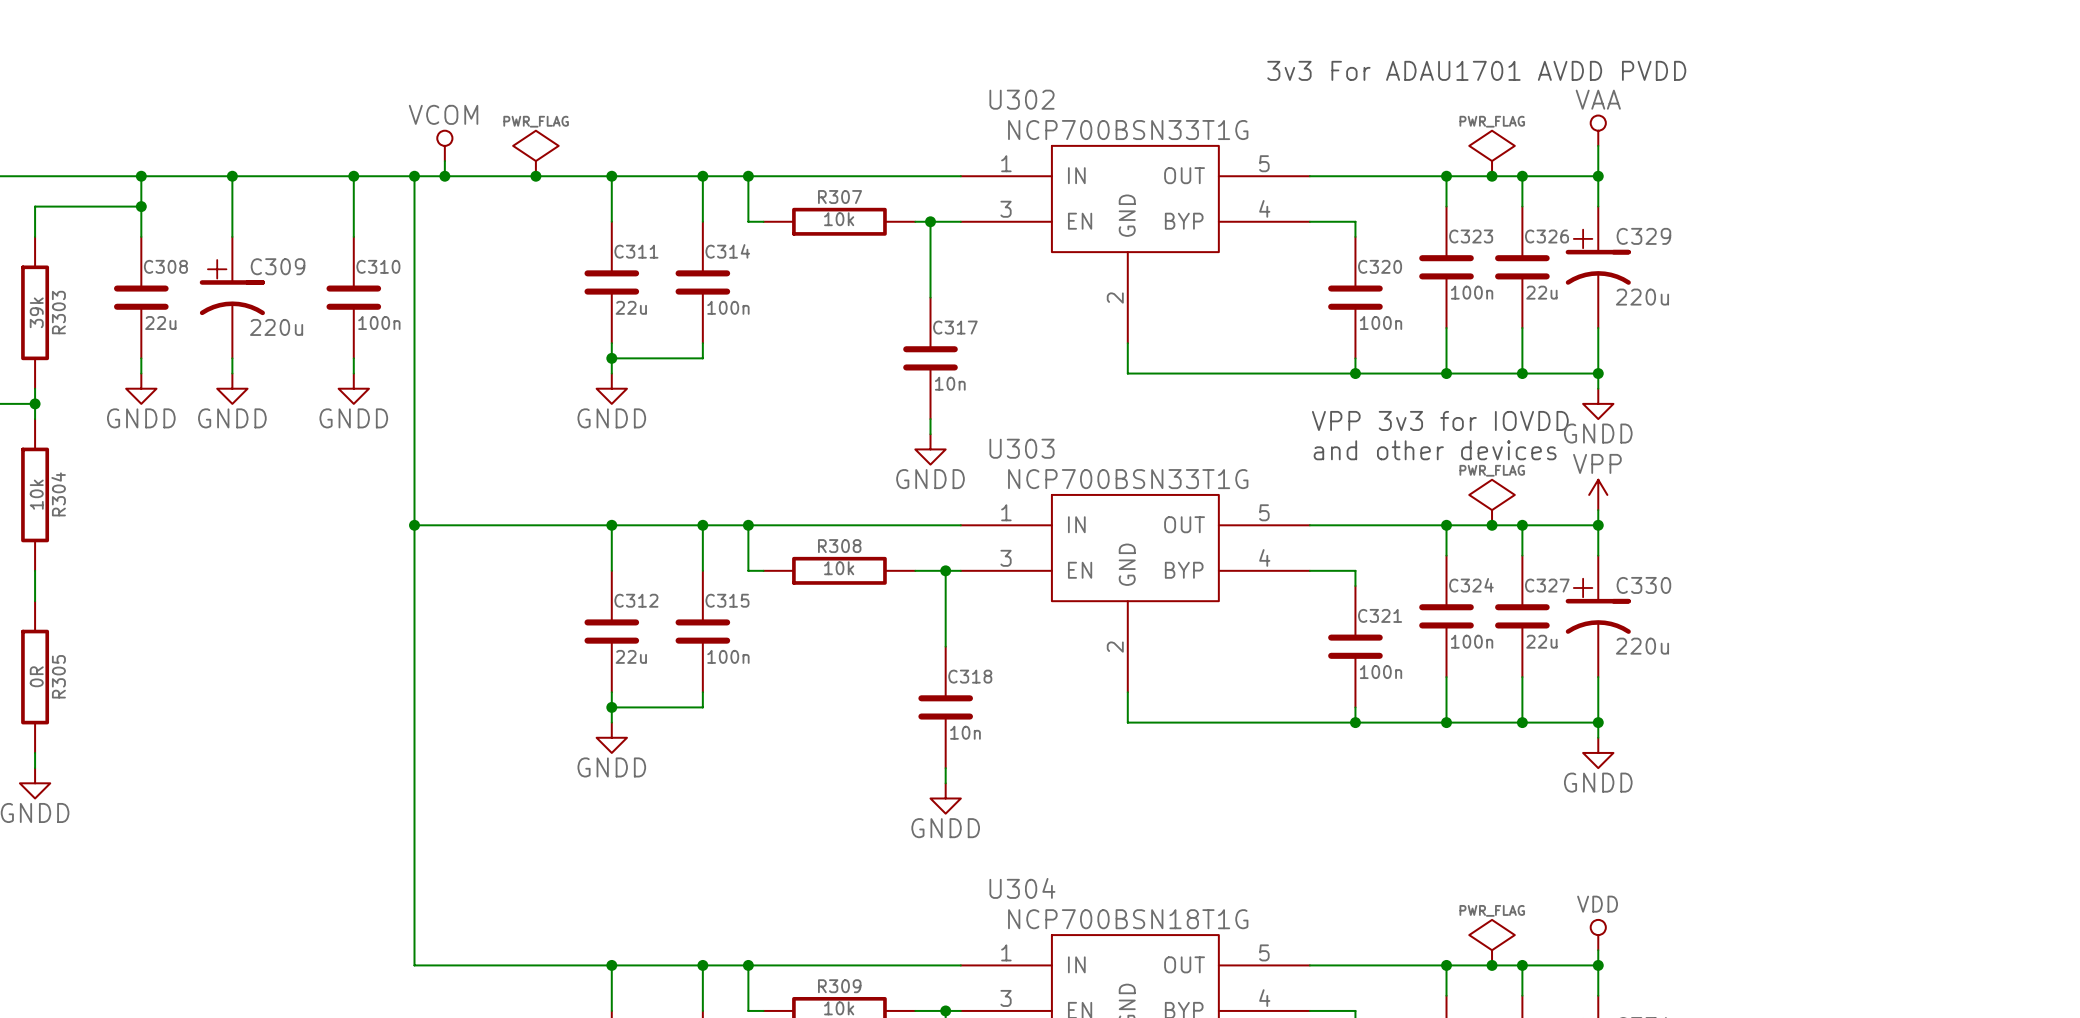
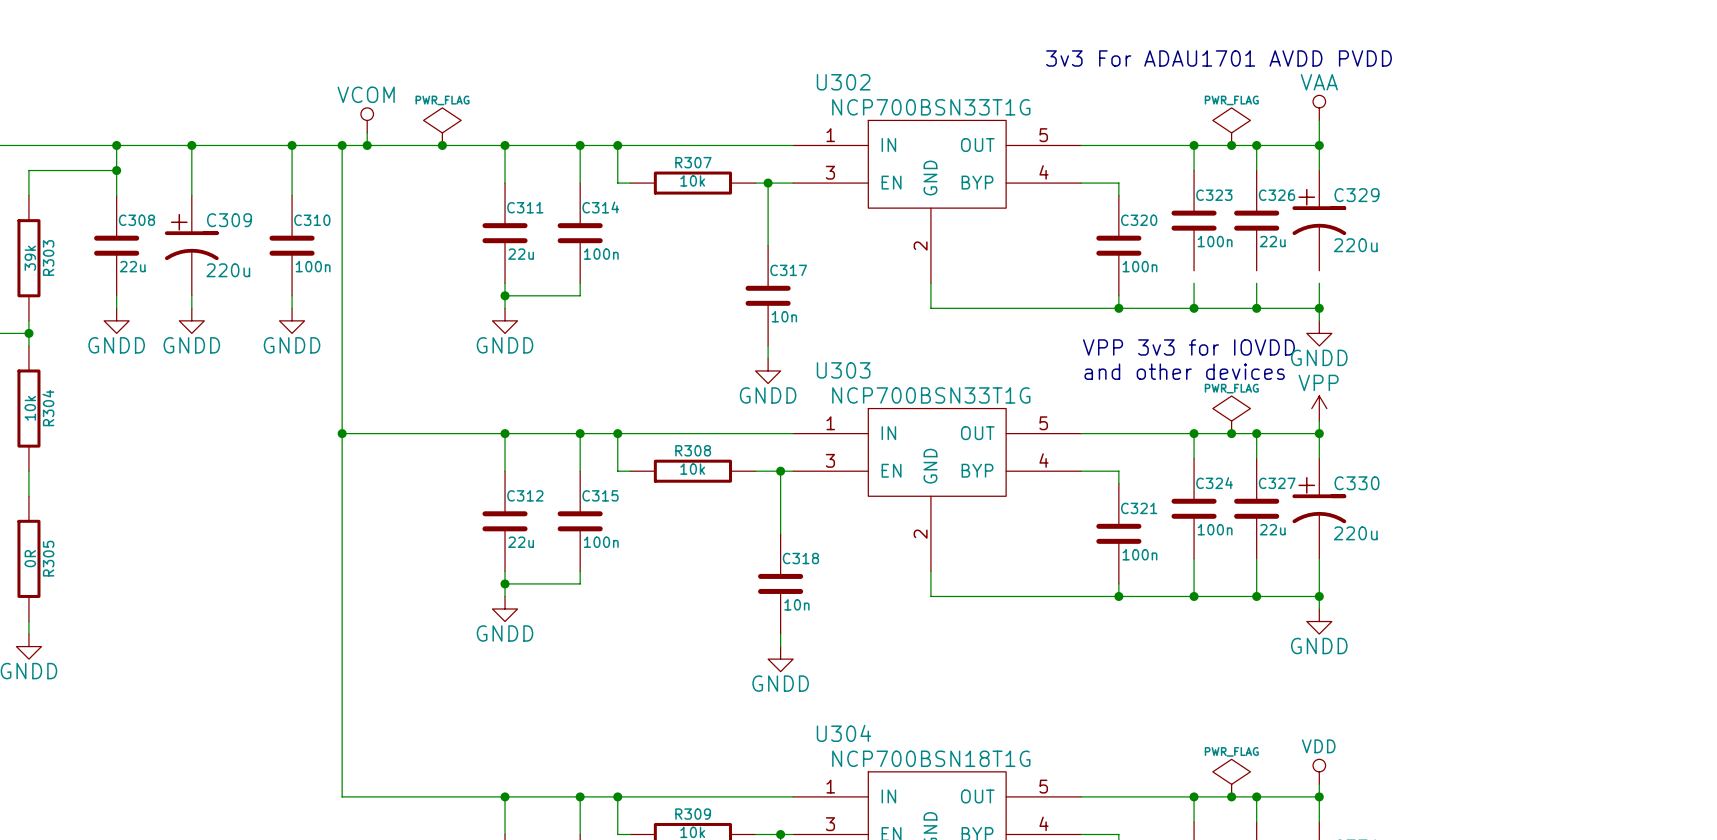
wire: (1446, 328) (1446, 343) -> none
wire: (1522, 328) (1522, 343) -> none
wire: (1598, 328) (1598, 343) -> none

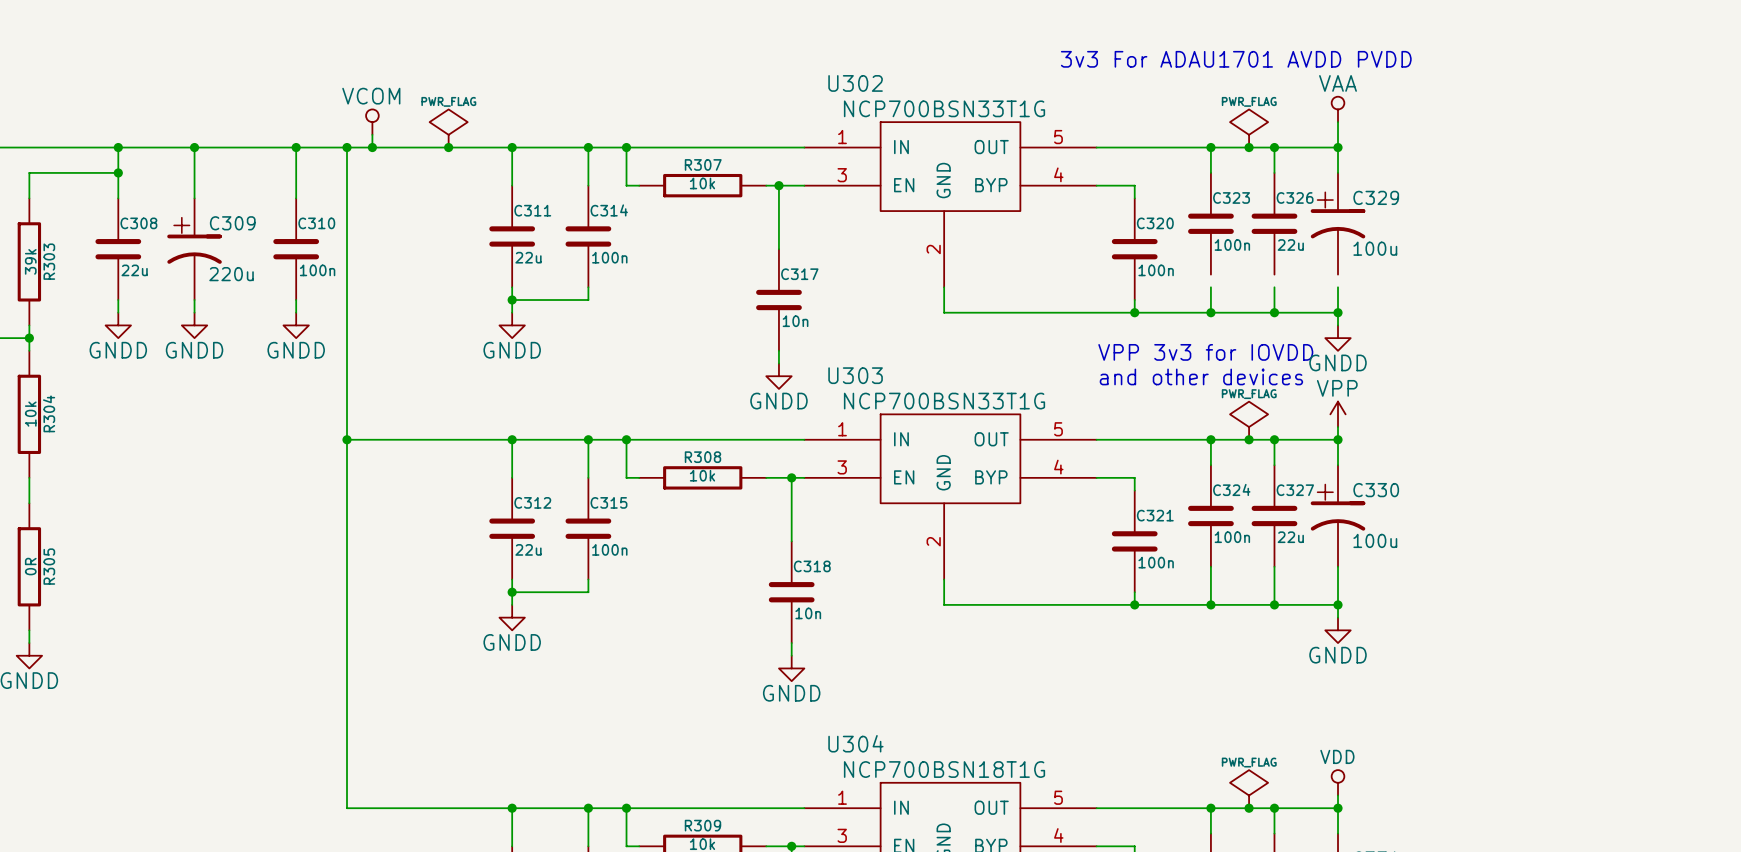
C329 value: 220u (1355, 245) -> 100u (1375, 248)
C330 value: 220u (1355, 533) -> 100u (1375, 540)

